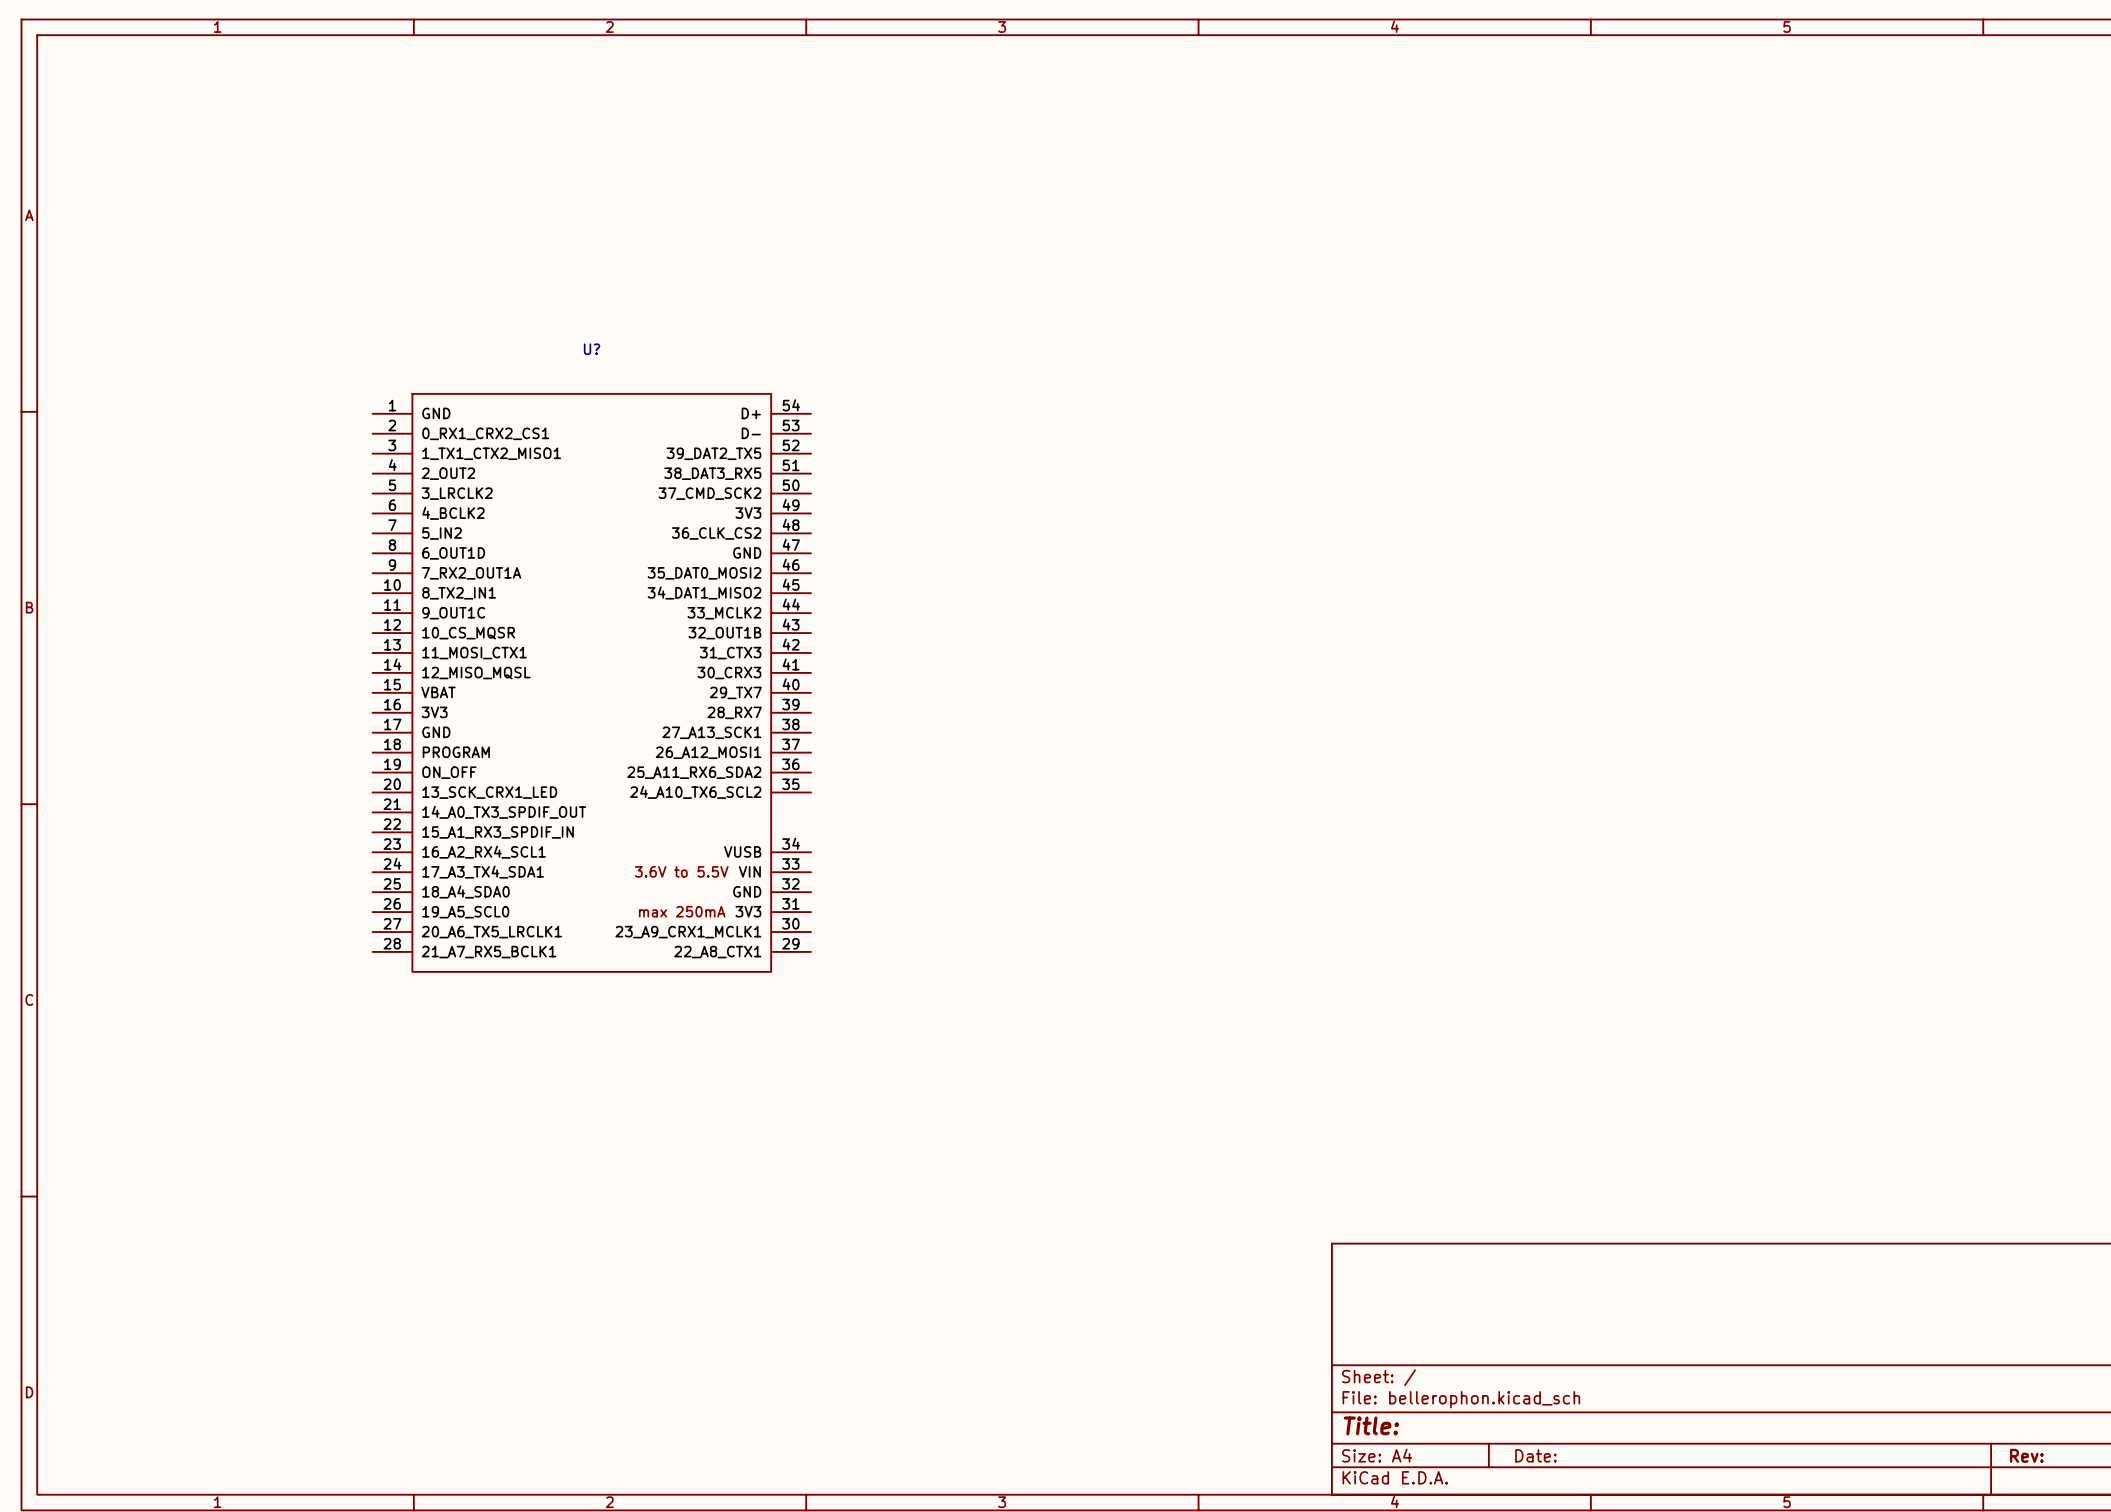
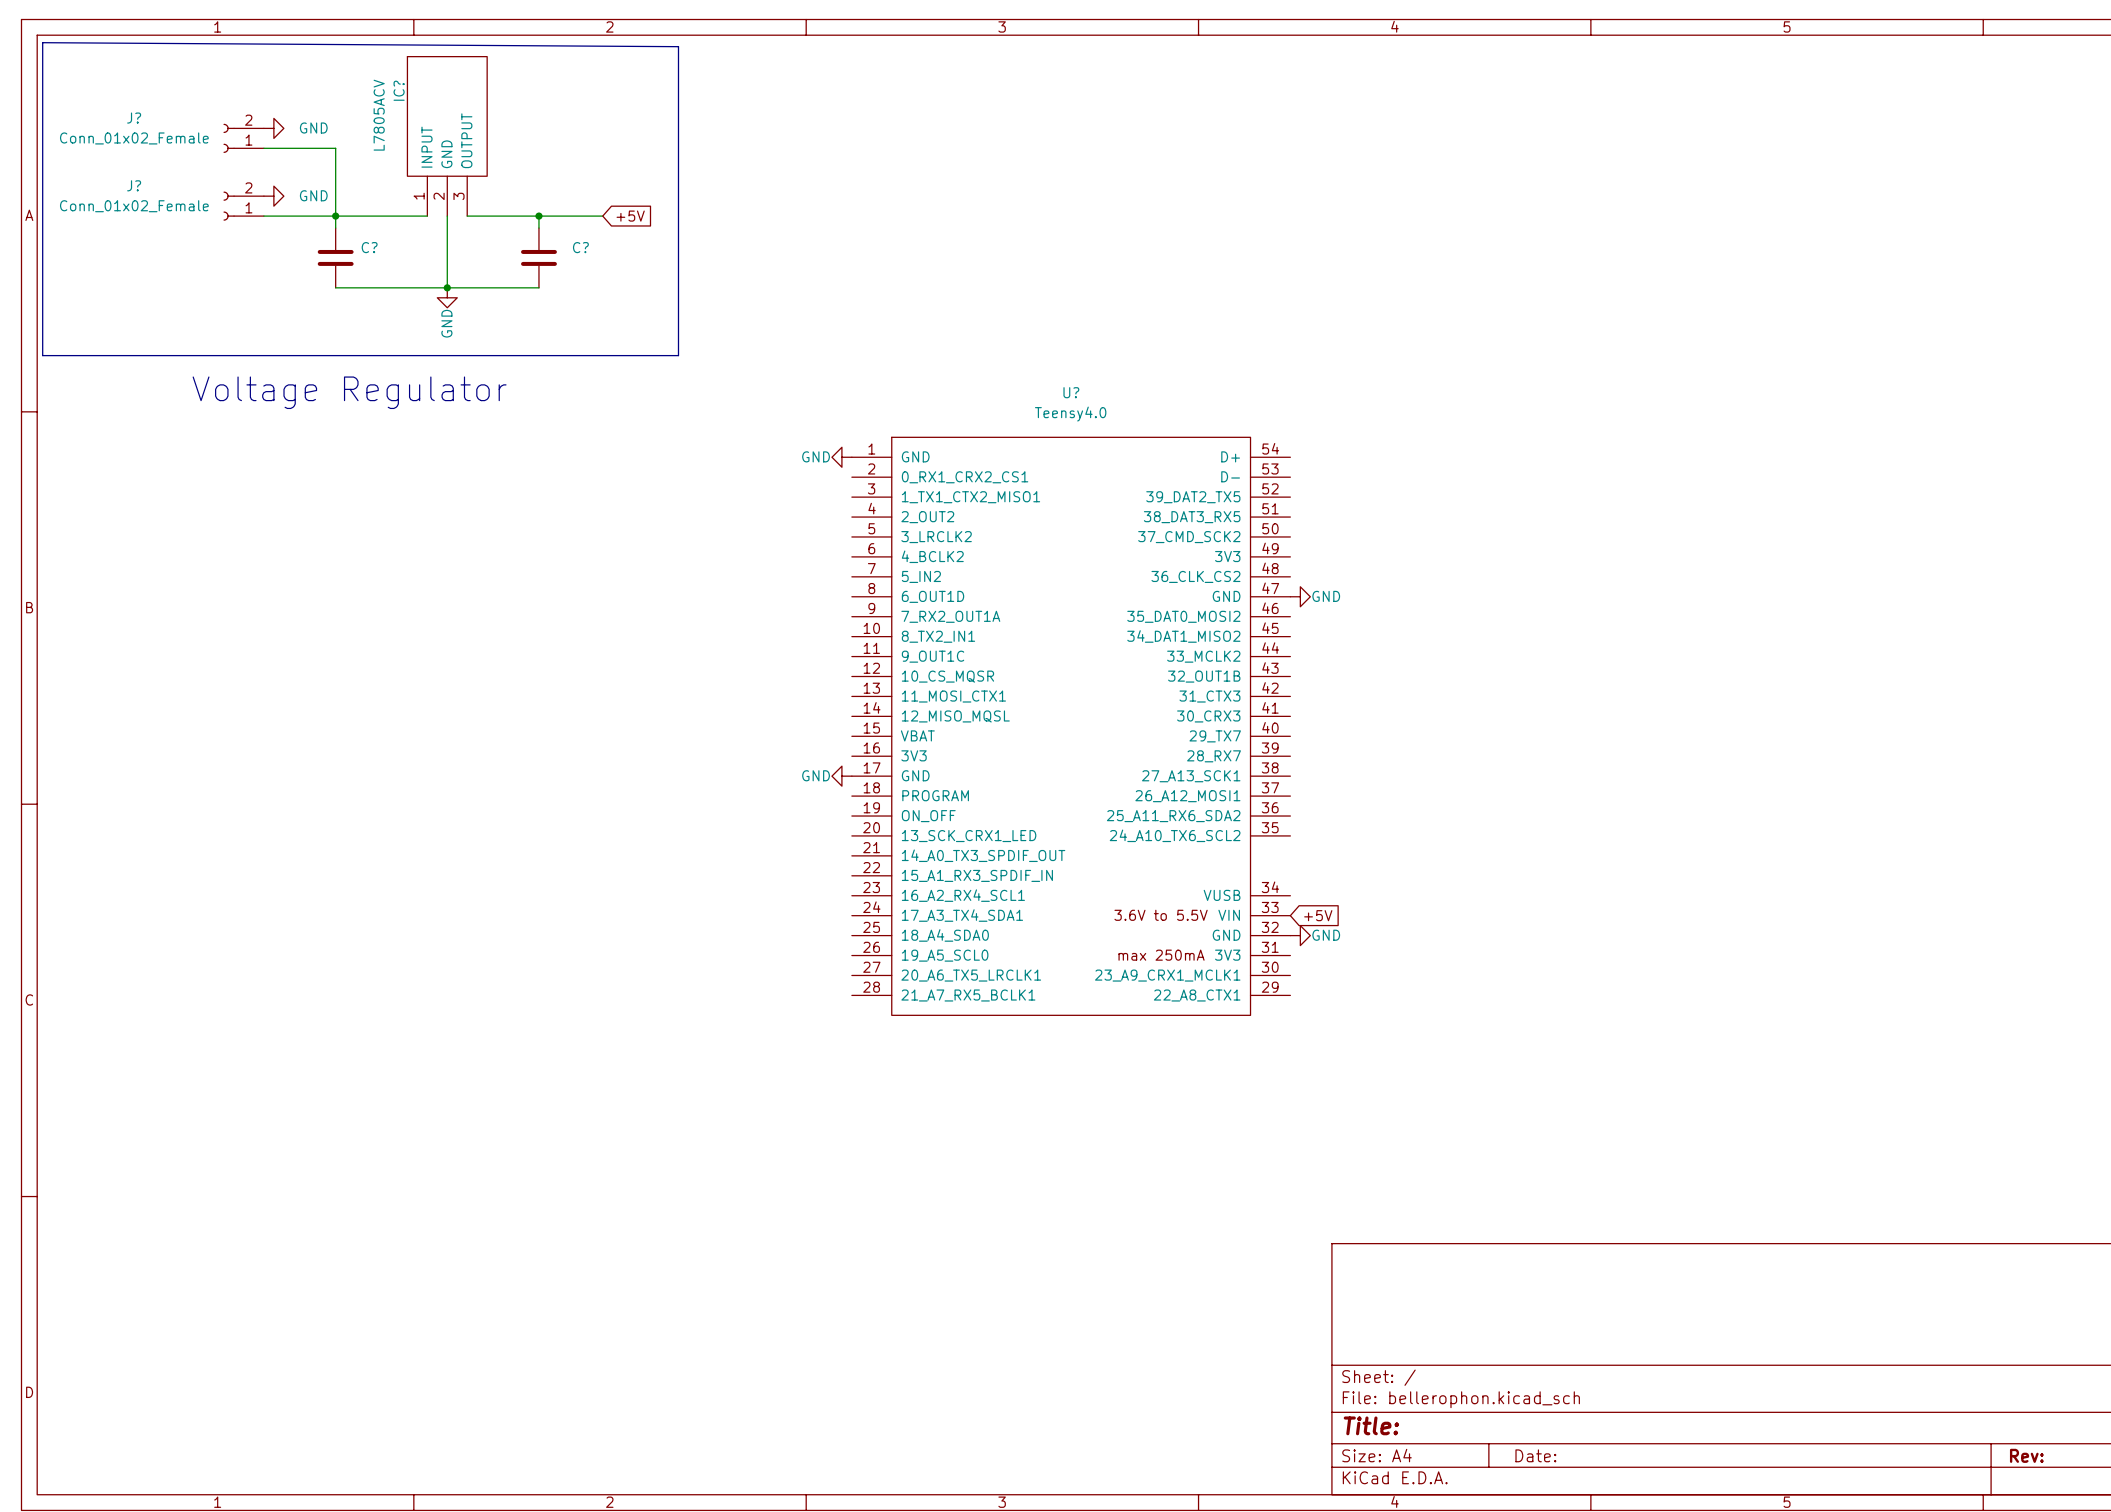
line: none -> (42, 42) (678, 46) (678, 355) (42, 355) (42, 42)
power symbol: none -> GND (273, 128)
IC?: none -> L7805ACV (447, 136)
J?: none -> Conn_01x02_Female (243, 138)
wire: none -> (263, 148) (335, 148) (335, 228)
power symbol: none -> GND (273, 196)
J?: none -> Conn_01x02_Female (243, 206)
wire: none -> (263, 216) (427, 216)
junction: none -> (335, 216)
wire: none -> (447, 216) (447, 287)
wire: none -> (467, 216) (602, 216)
wire: none -> (538, 216) (538, 228)
junction: none -> (538, 216)
global label: none -> +5V (630, 216)
C?: none -> (335, 257)
C?: none -> (538, 257)
wire: none -> (335, 287) (538, 287)
junction: none -> (447, 287)
power symbol: none -> GND (447, 297)
text: none -> Voltage Regulator (349, 392)
power symbol: none -> GND (841, 457)
power symbol: none -> GND (1300, 596)
U?: (591, 682) -> none
U?: none -> Teensy4.0 (1071, 726)
power symbol: none -> GND (841, 776)
global label: none -> +5V (1318, 915)
power symbol: none -> GND (1300, 935)

